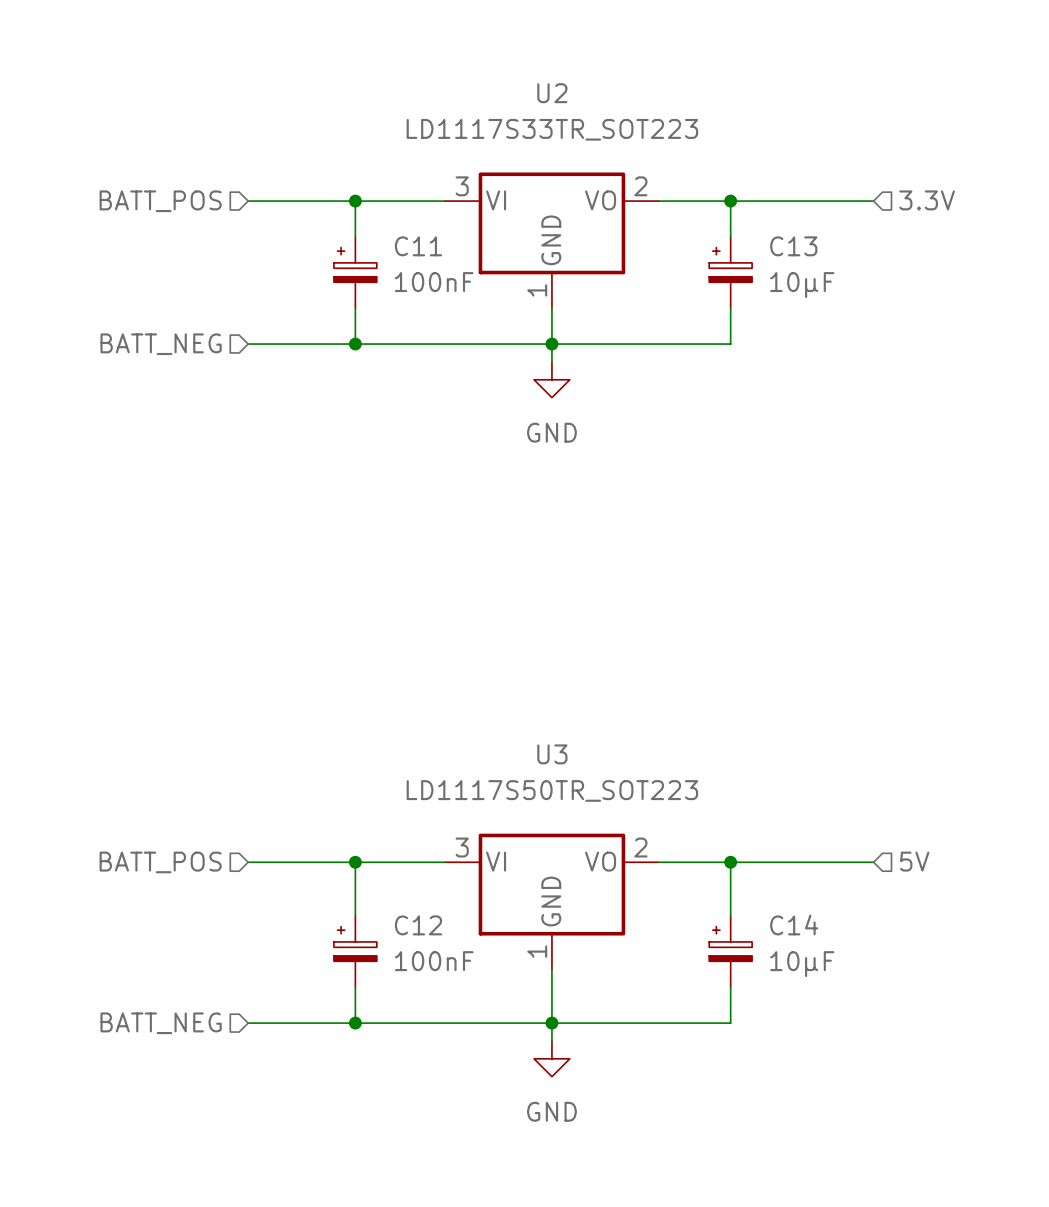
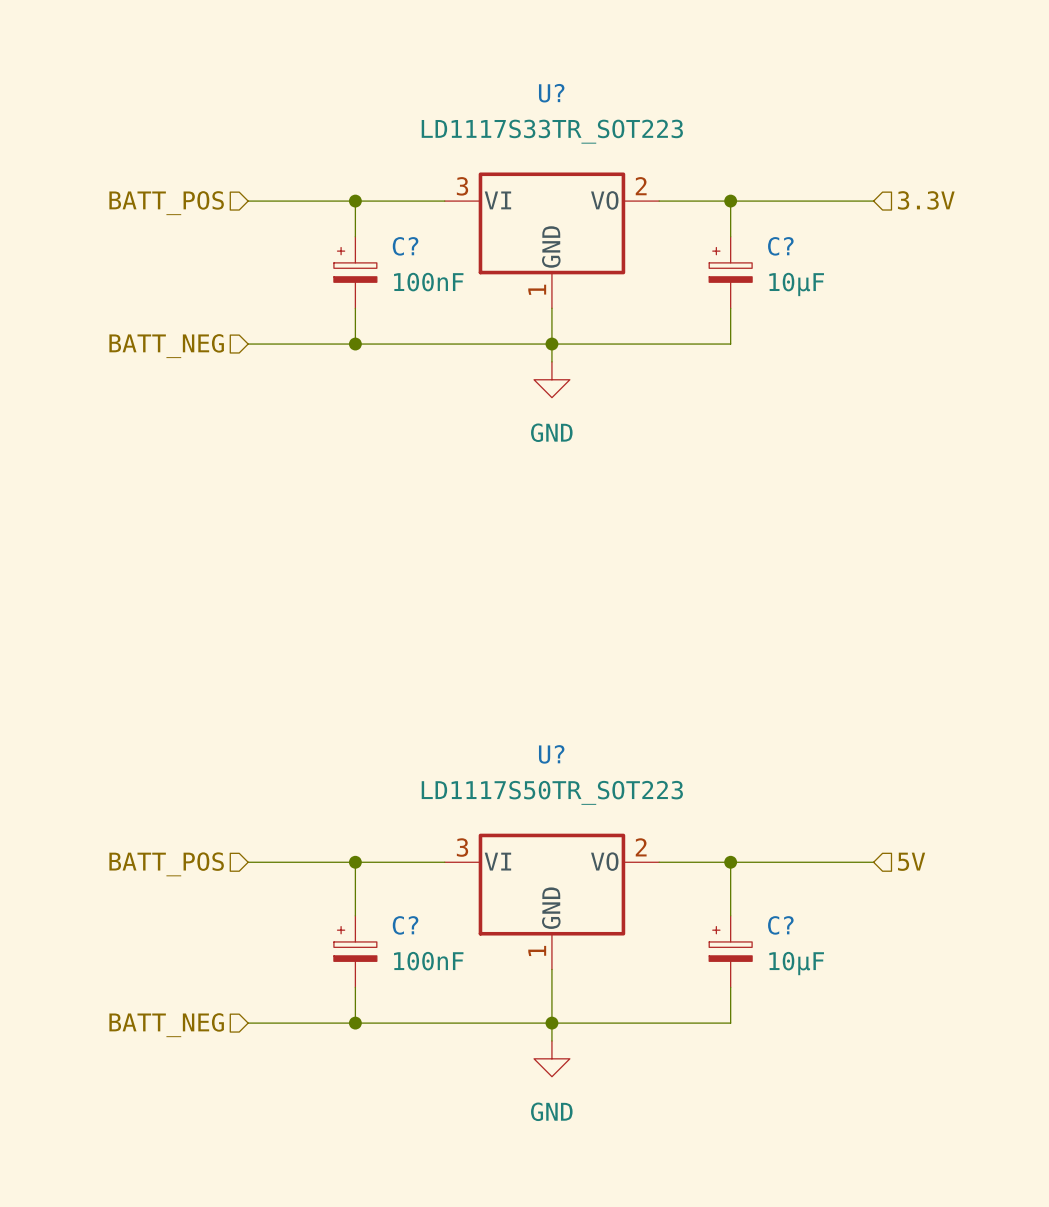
U2 name: U2 (552, 93) -> U? (551, 93)
C11 name: C11 (418, 246) -> C? (405, 246)
C13 name: C13 (793, 246) -> C? (780, 246)
U3 name: U3 (552, 754) -> U? (551, 754)
C14 name: C14 (794, 924) -> C? (780, 925)
C12 name: C12 (418, 925) -> C? (405, 925)

